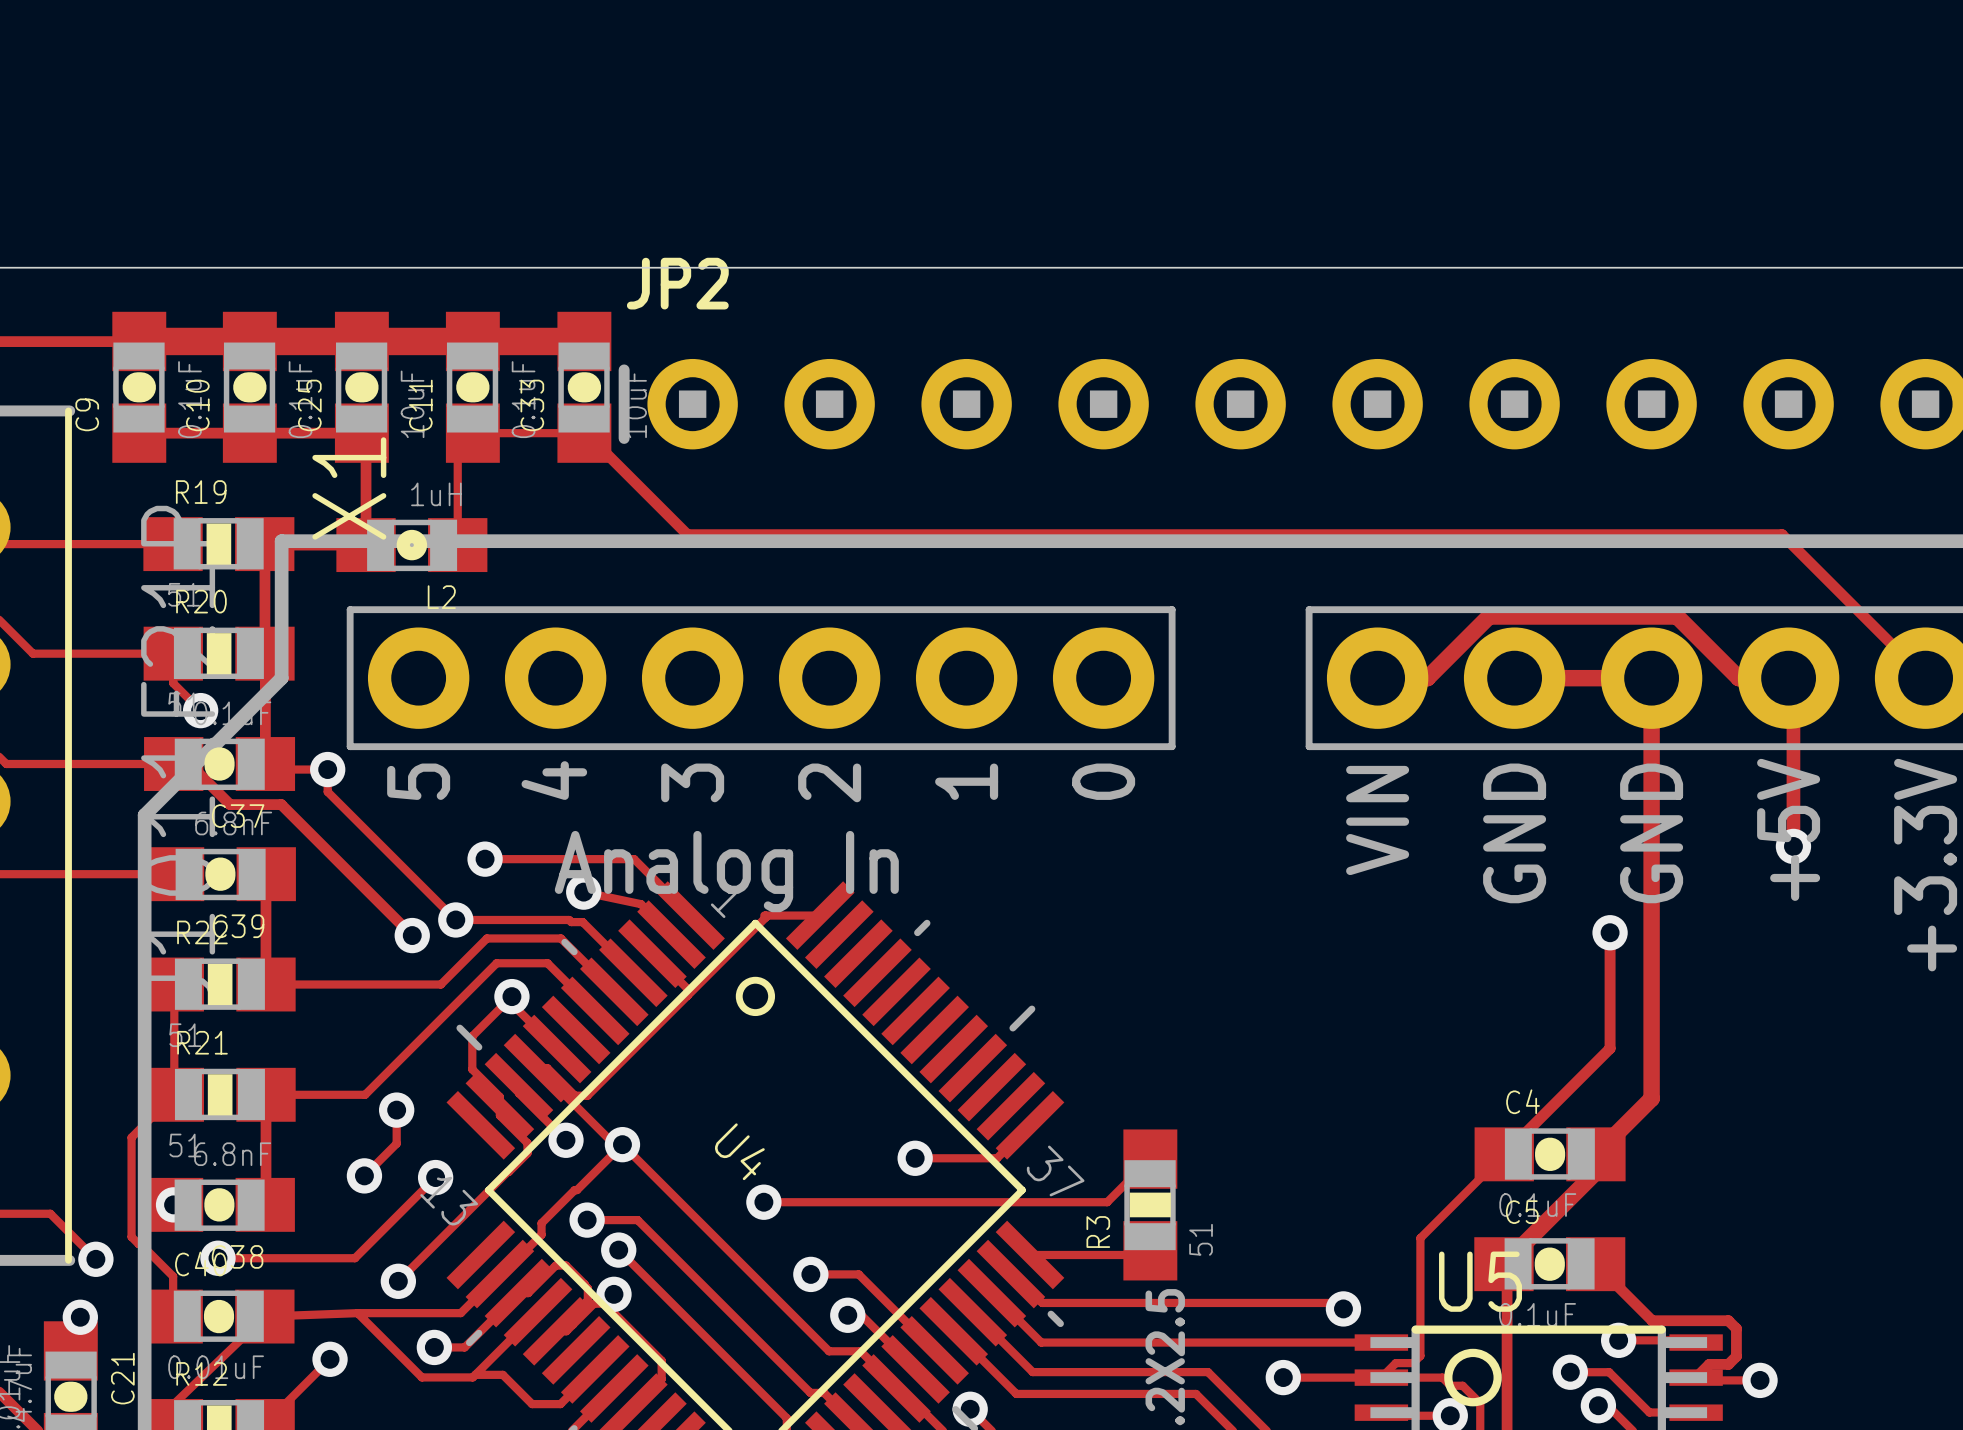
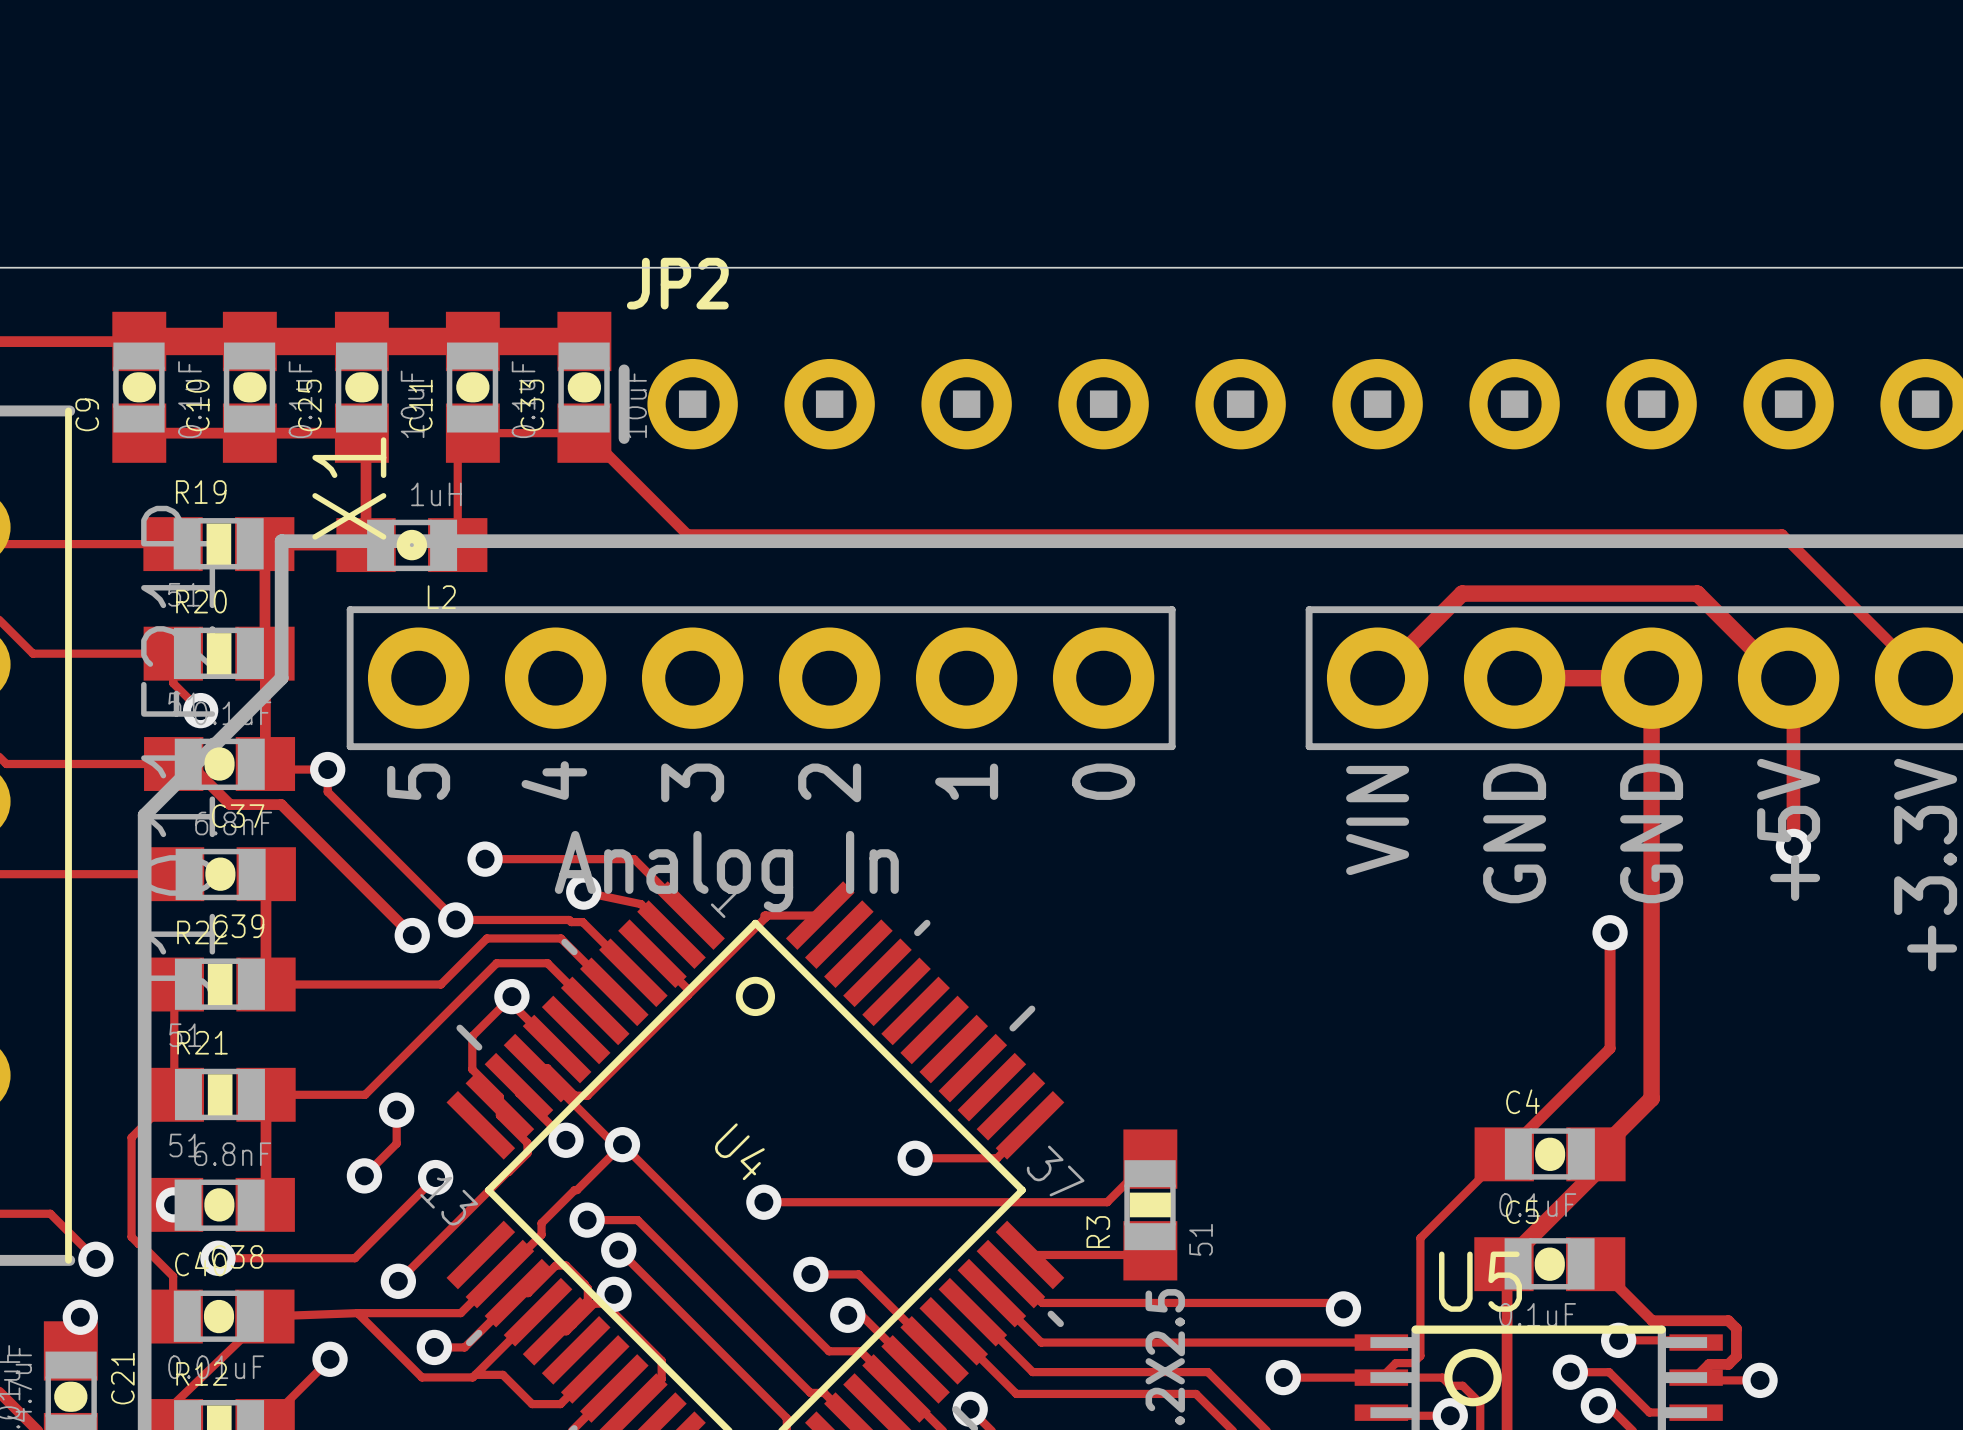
track: (1377, 678) (1427, 678) (1489, 616) (1677, 616) (1738, 678) (1788, 678) -> (1377, 678) (1462, 593) (1697, 593) (1786, 683) (1793, 683)

